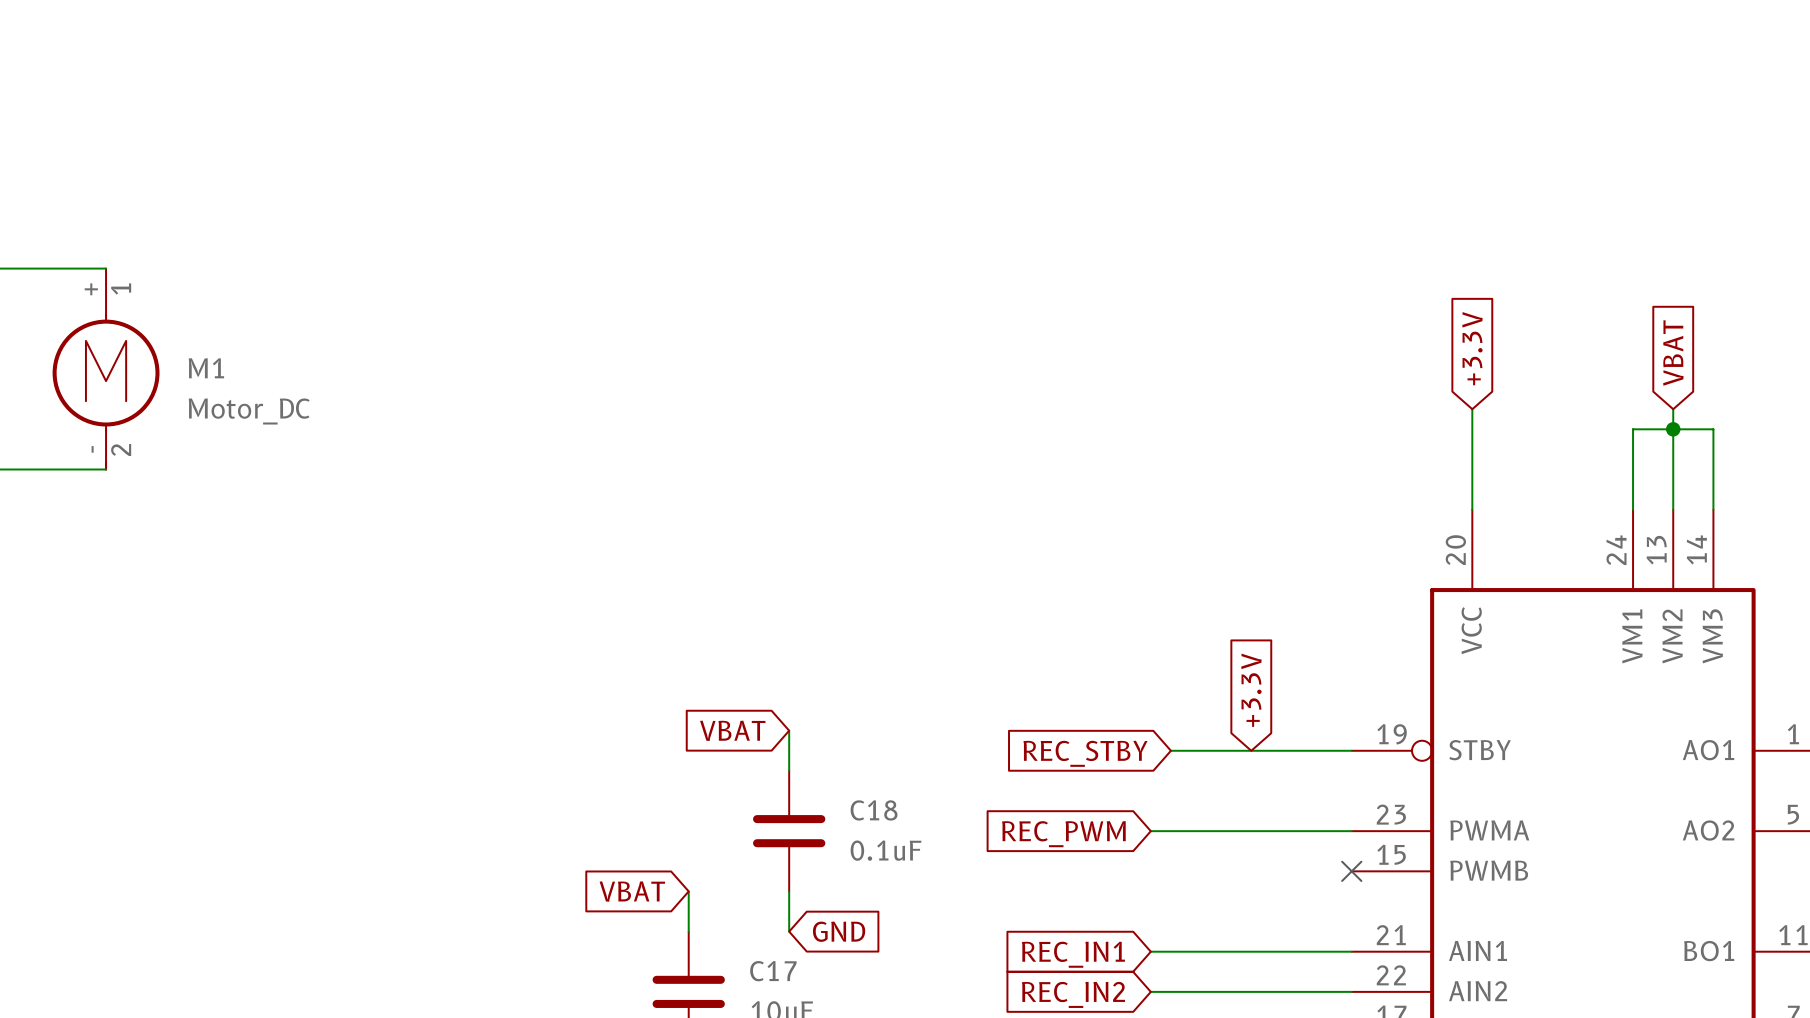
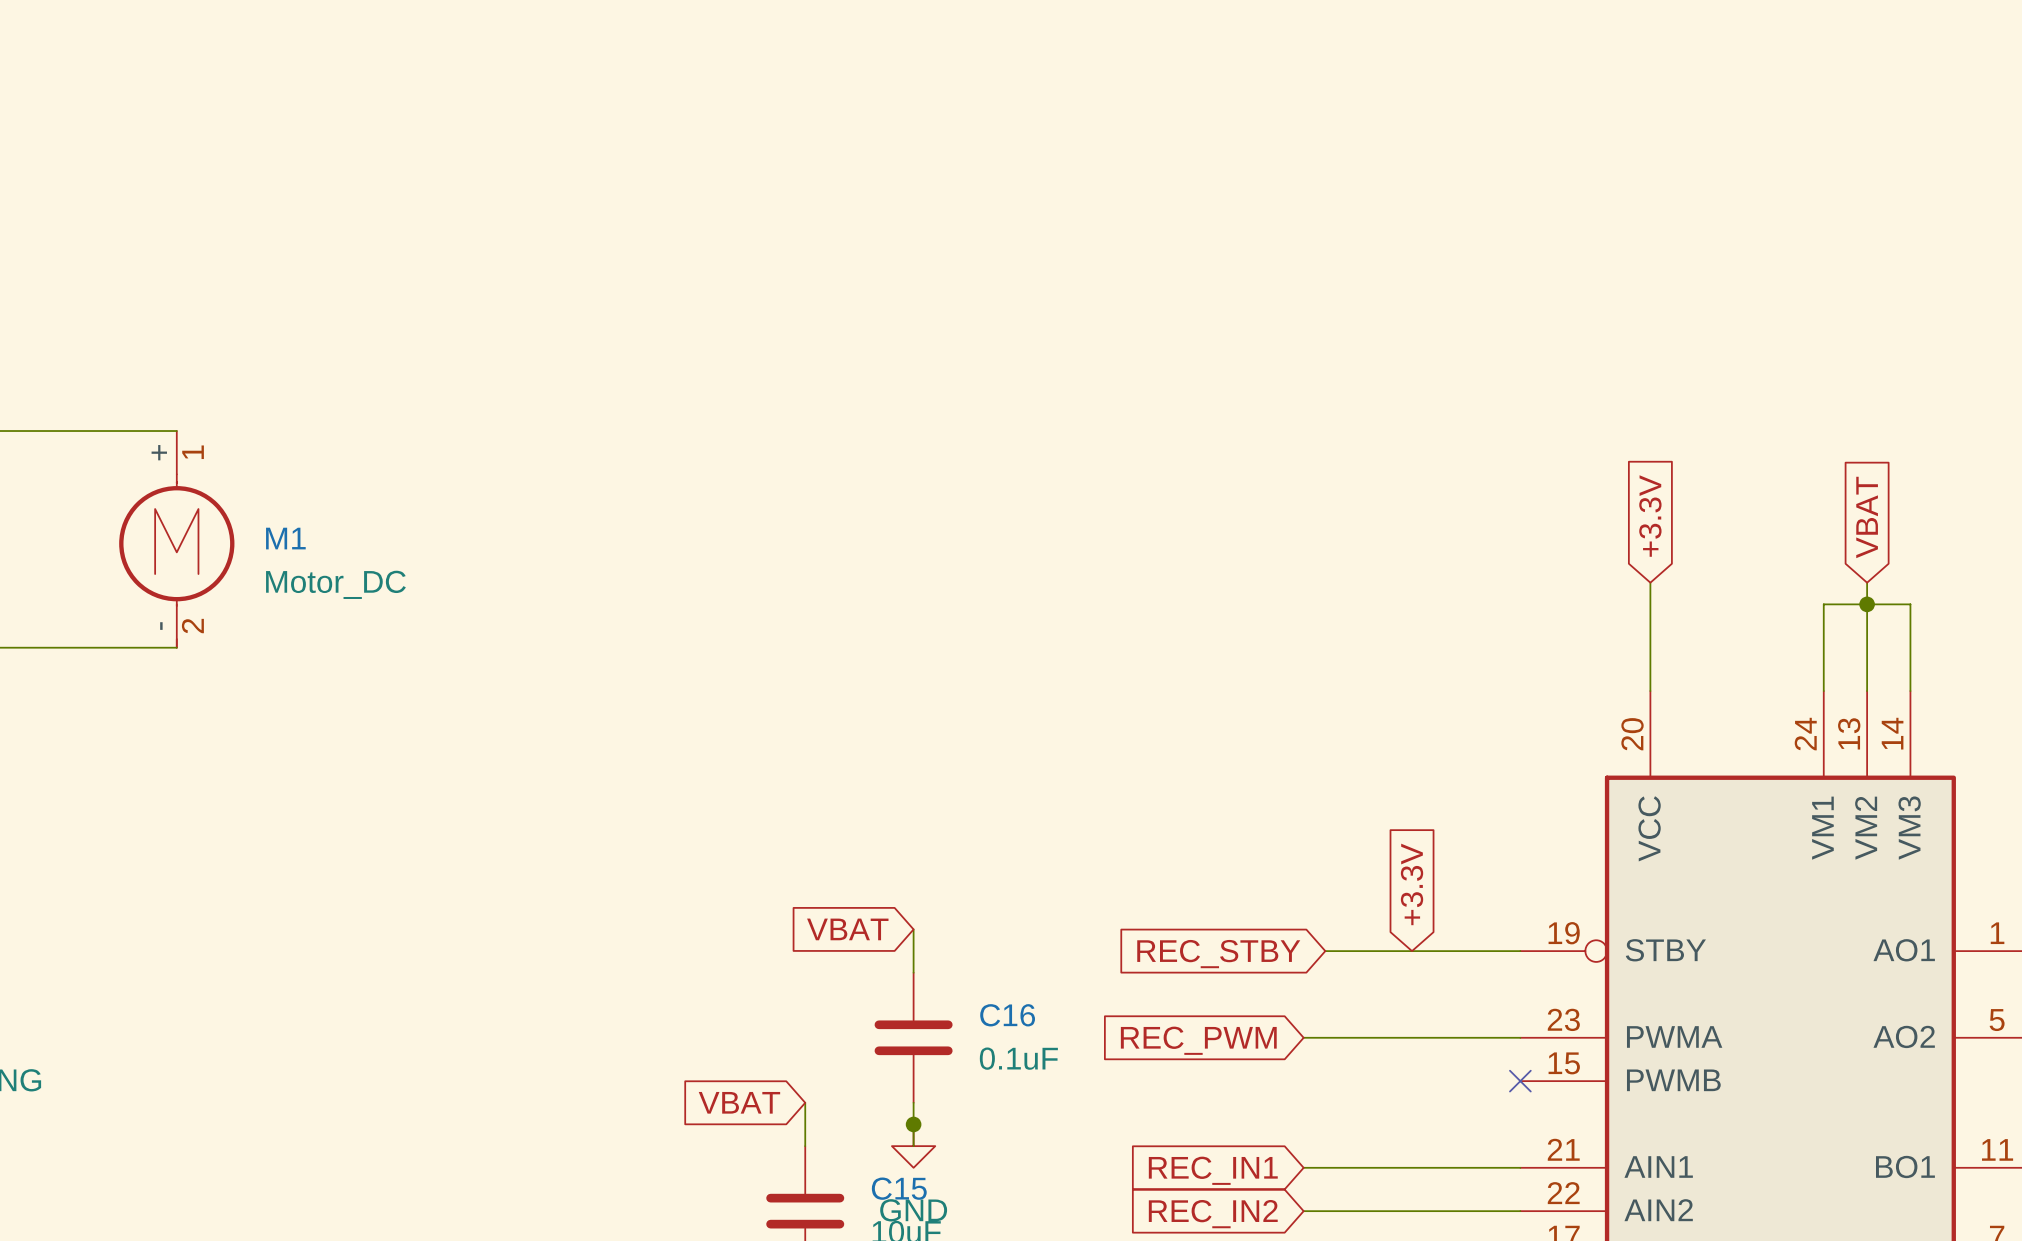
C18 name: C18 (874, 810) -> C16 (1007, 1015)
junction: none -> (913, 1124)
power symbol: none -> GND (913, 1146)
global label: GND (839, 931) -> none
C17 name: C17 (773, 971) -> C15 (899, 1188)

